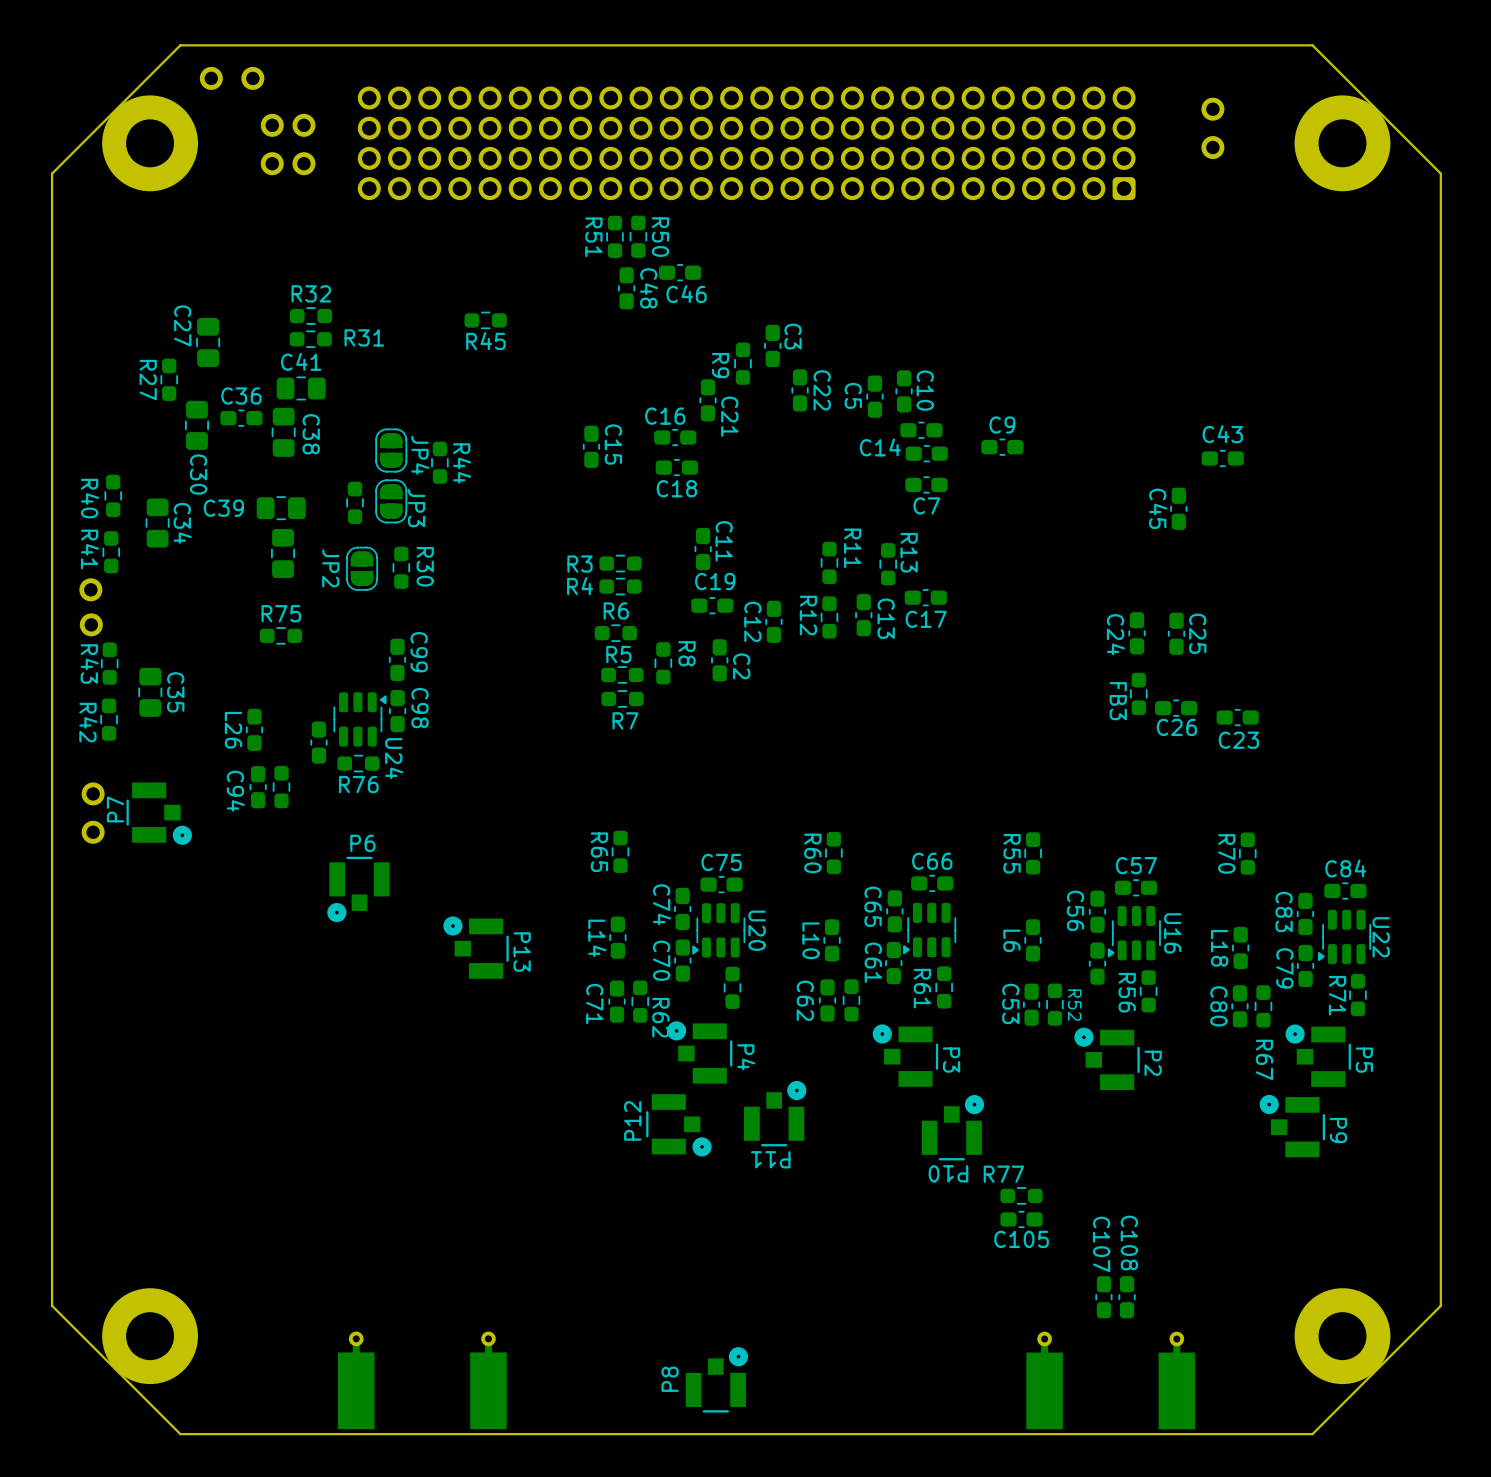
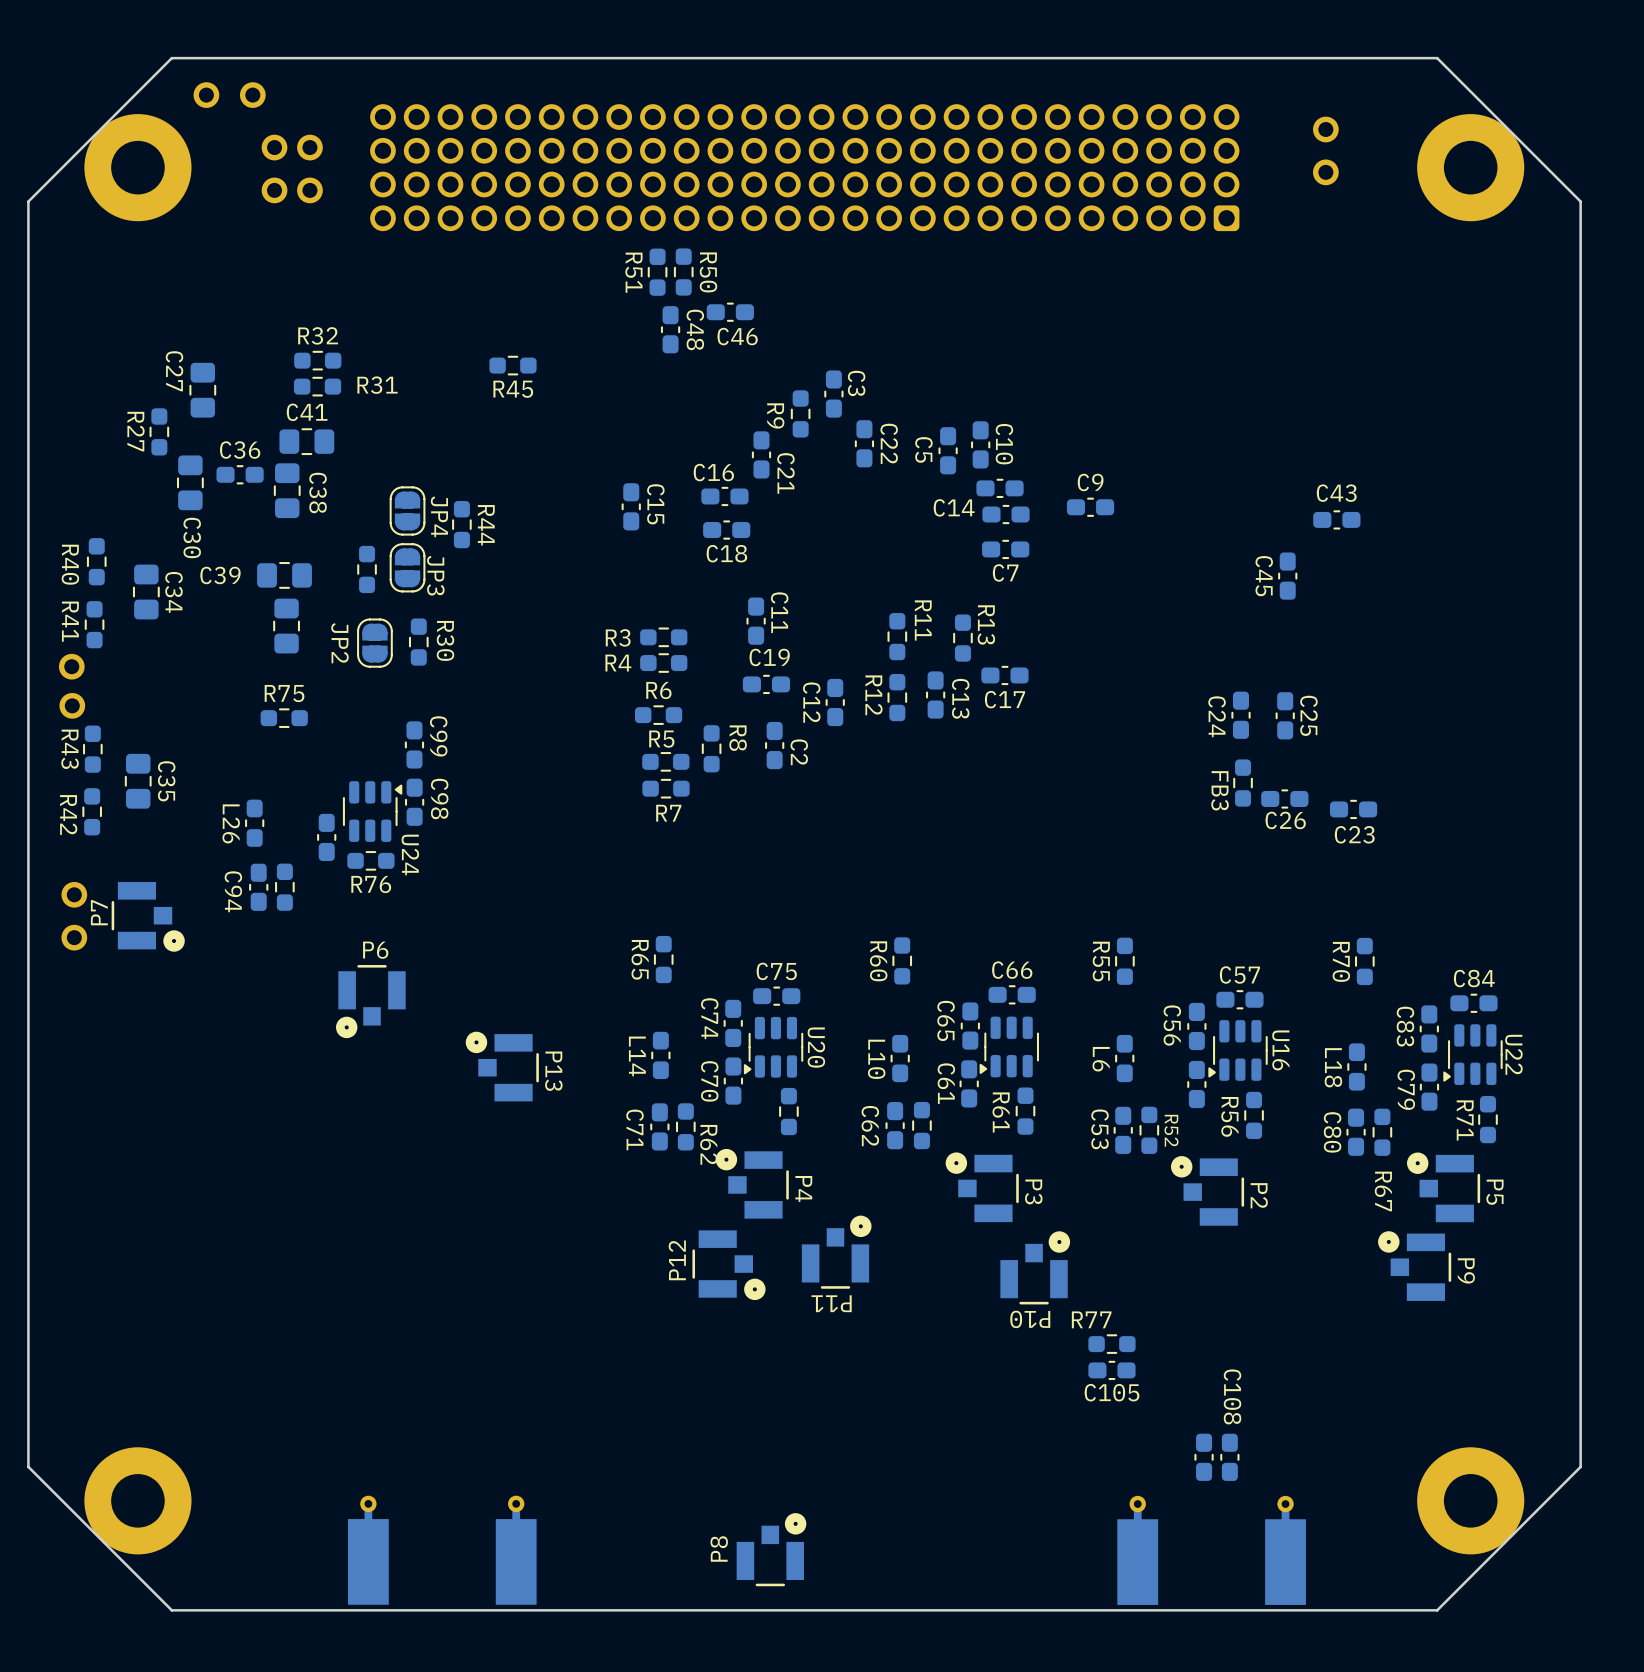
C107 name: C107 (1101, 1244) -> none

